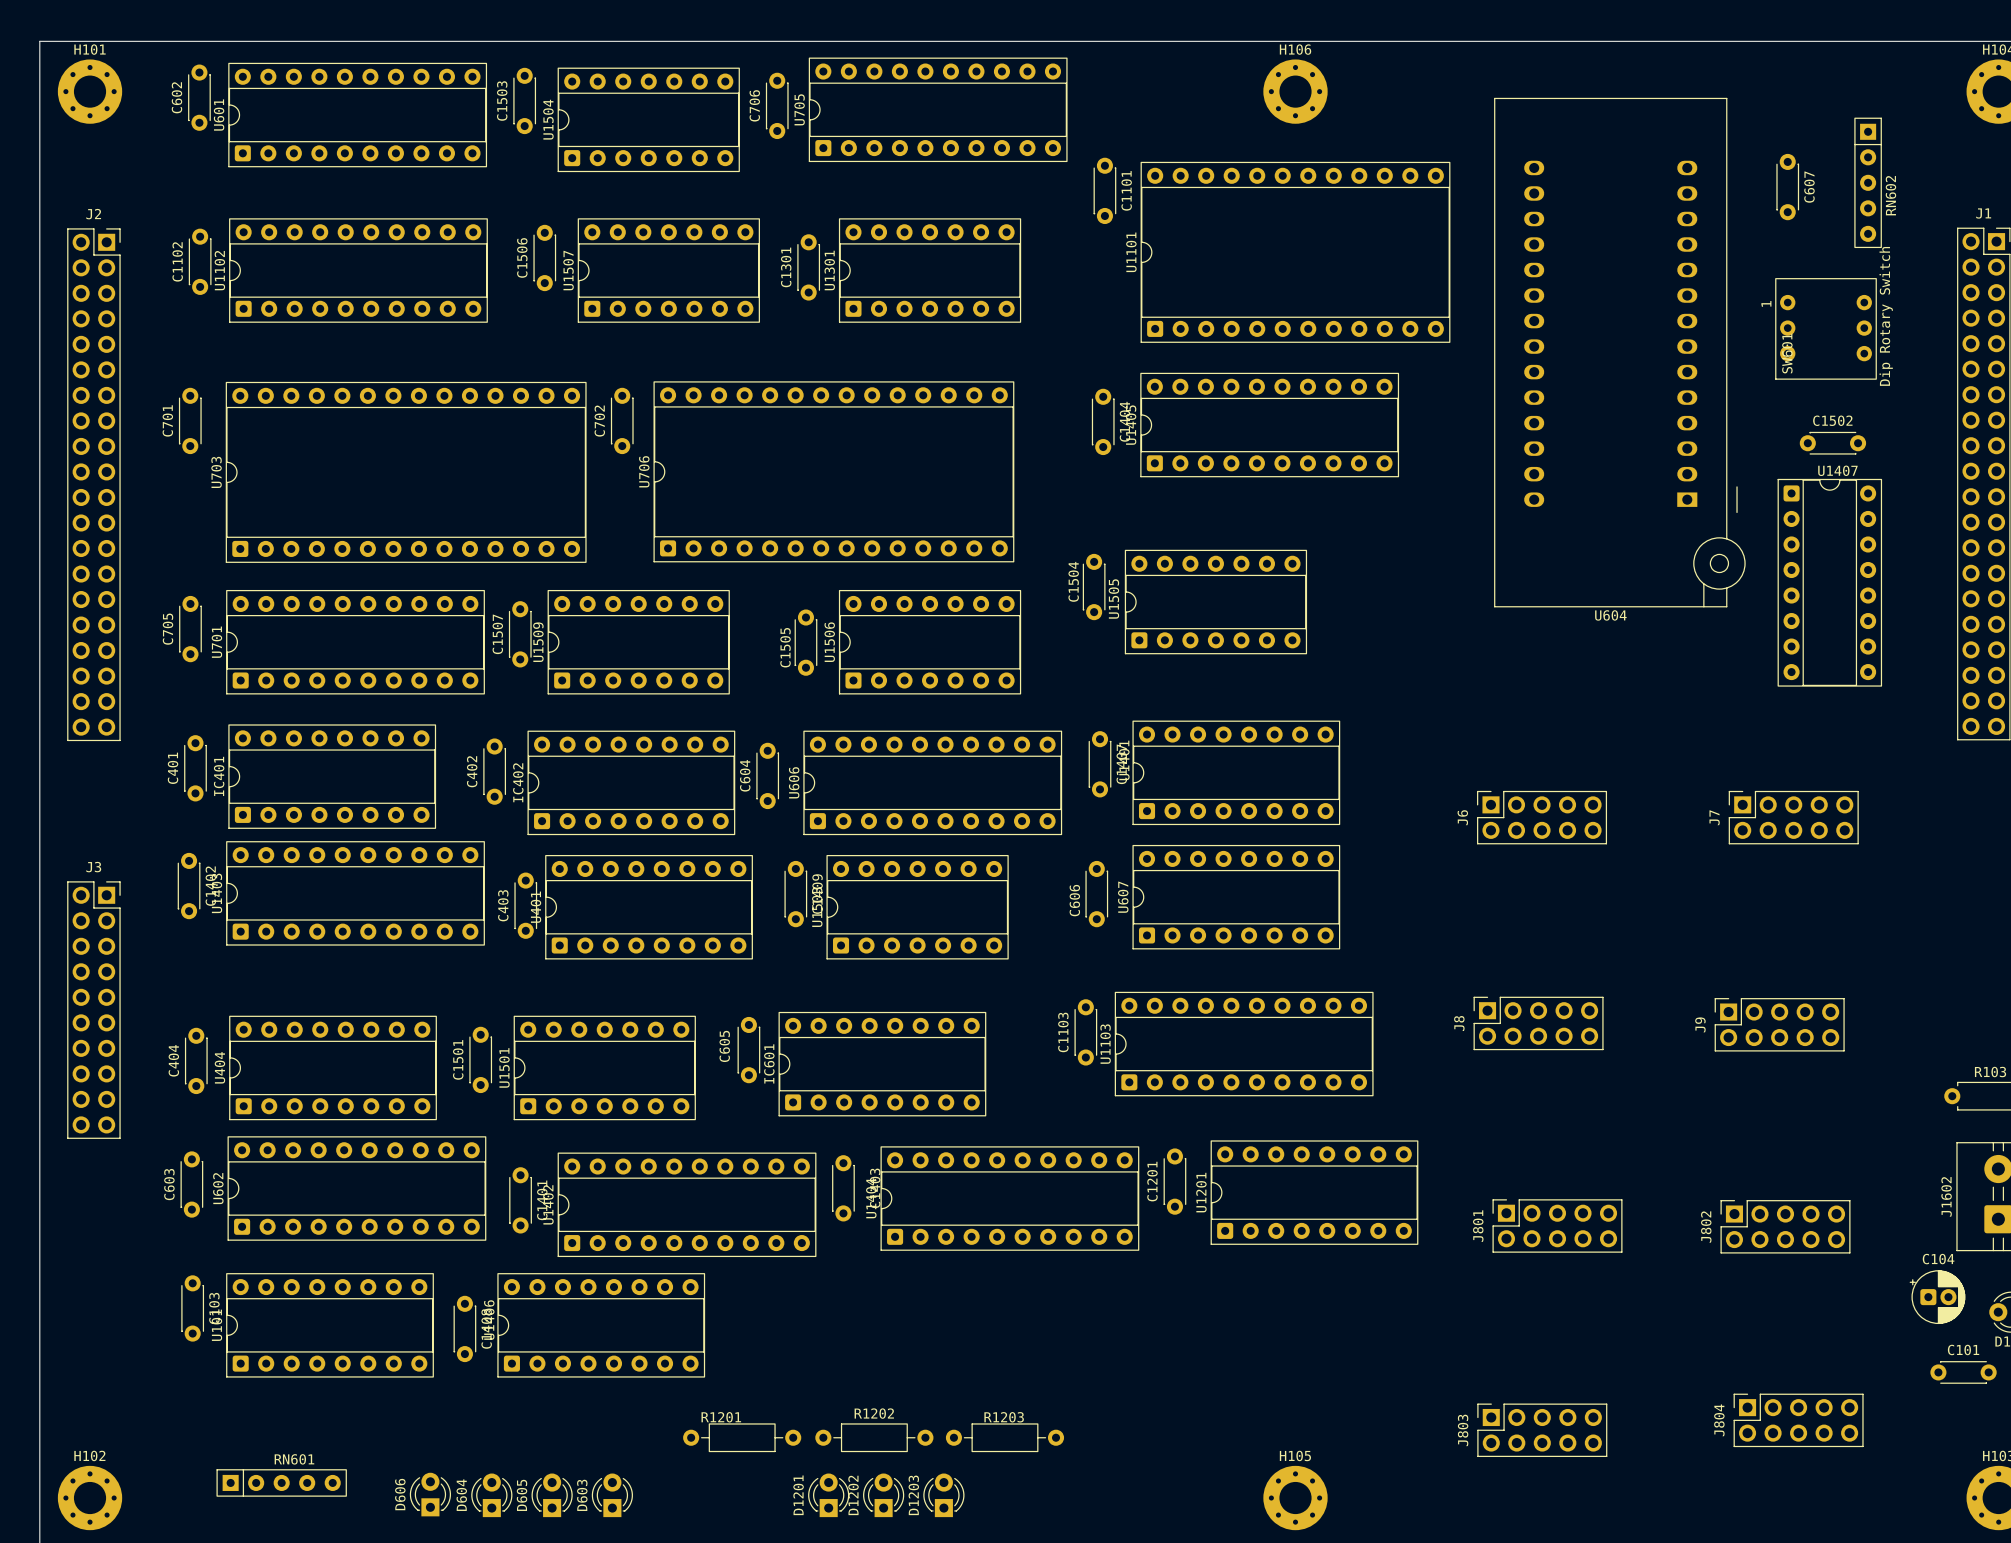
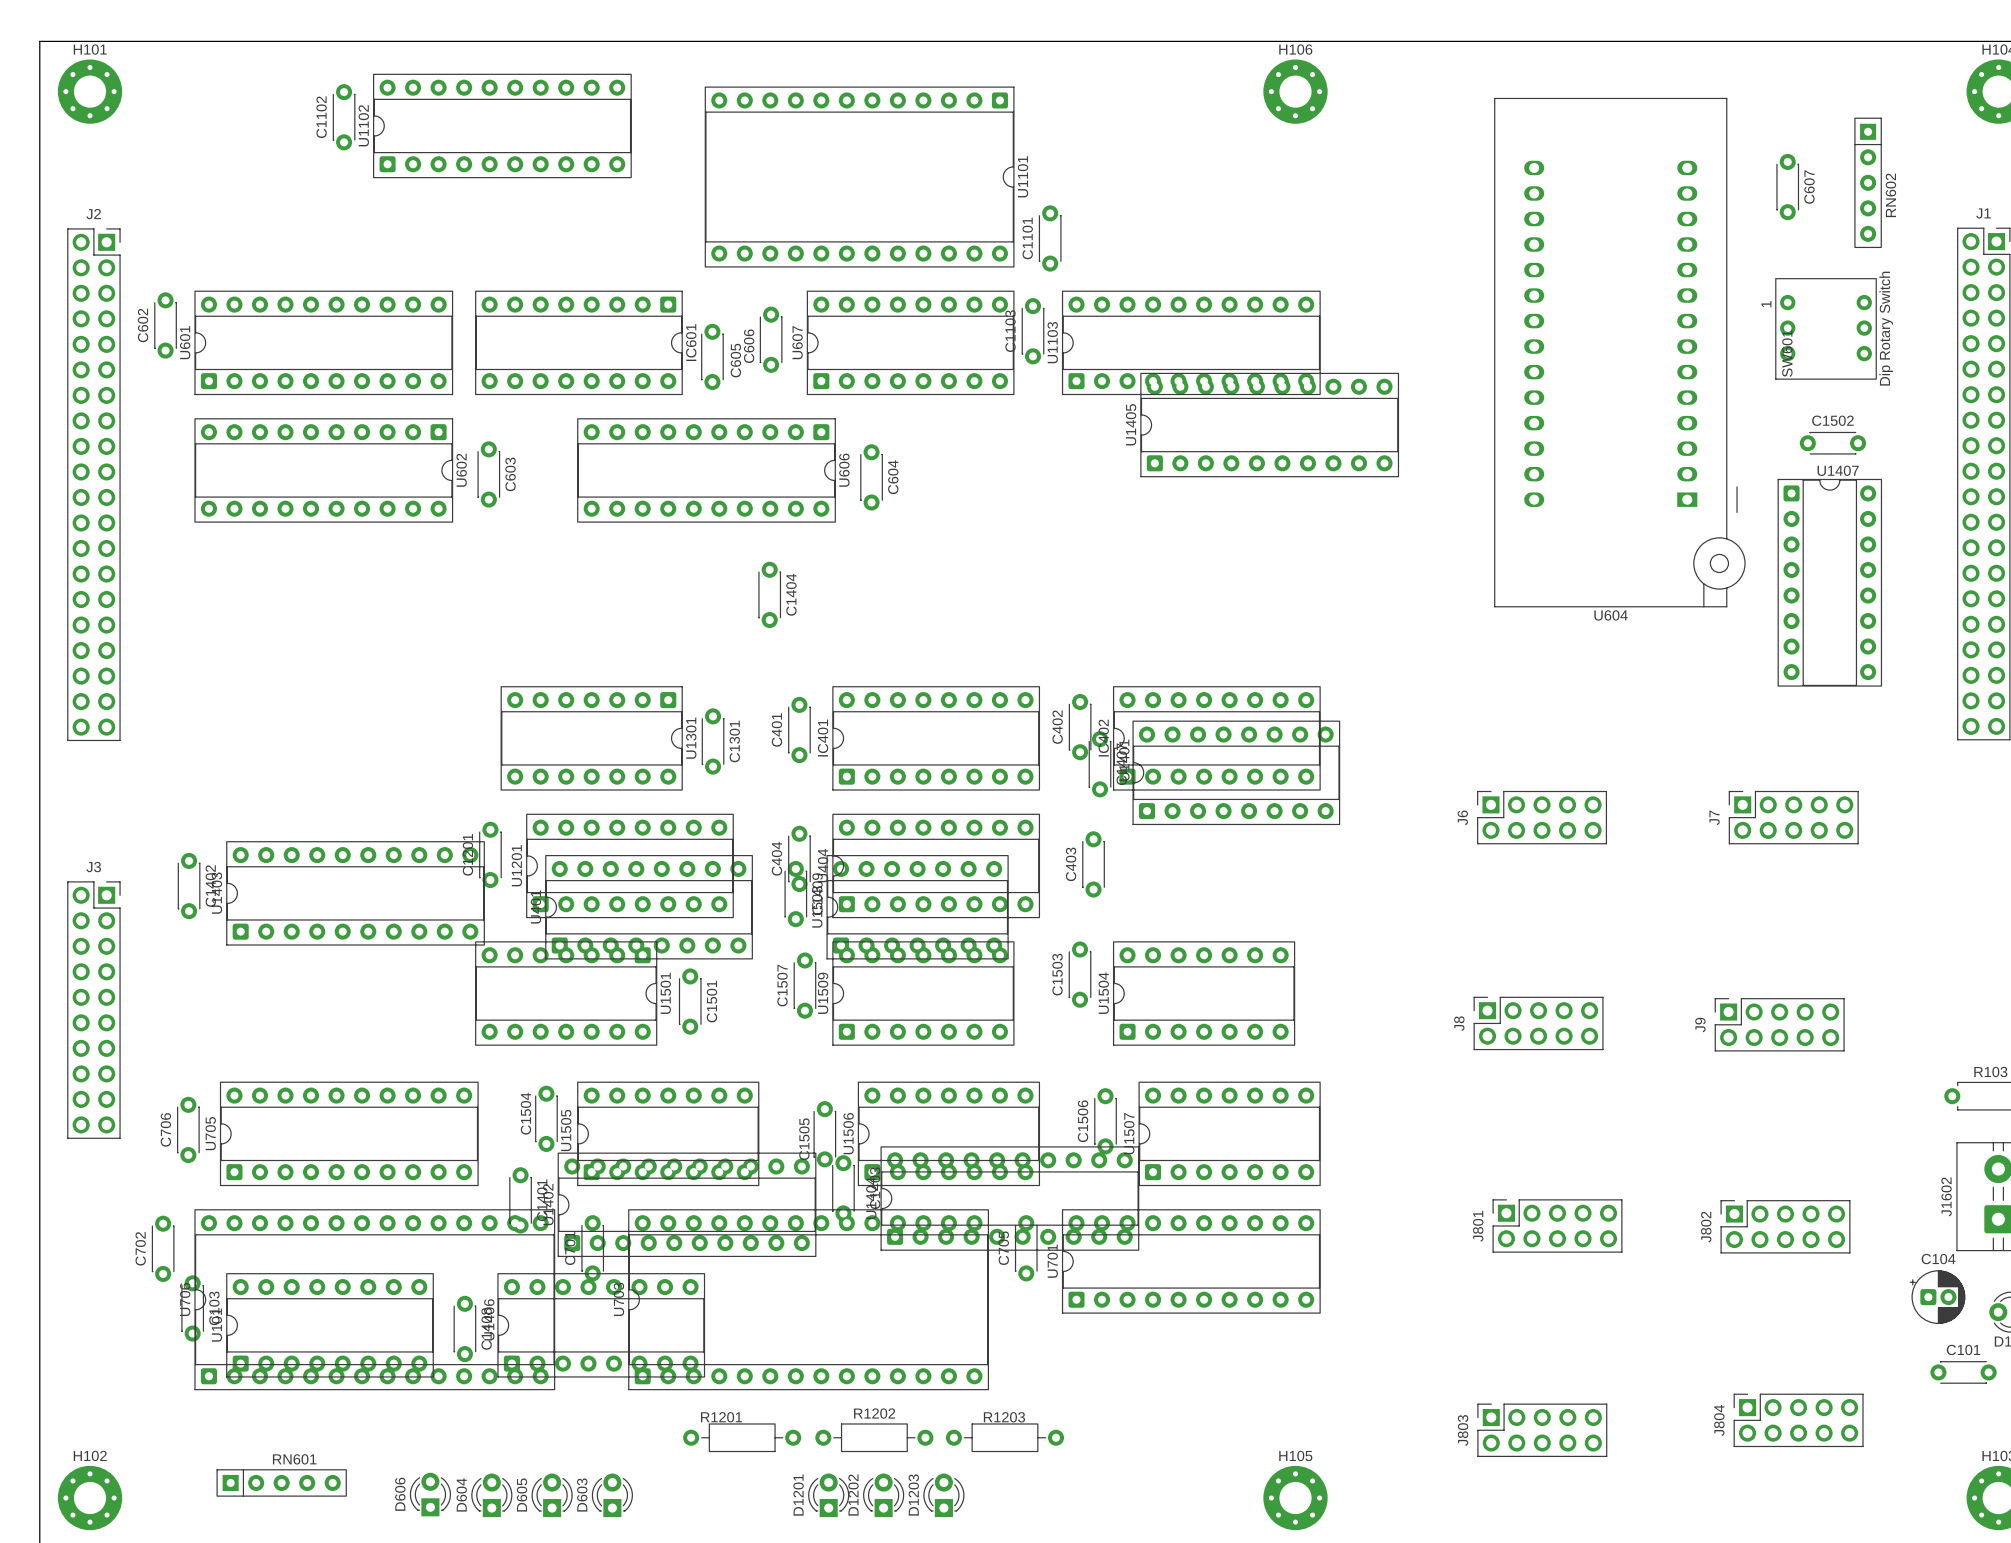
C602 position: (199, 97) -> (165, 325)
C1503 position: (524, 100) -> (1080, 974)
C706 position: (777, 105) -> (188, 1129)
U705 position: (938, 109) -> (349, 1133)
U601 position: (357, 115) -> (323, 342)
U1504 position: (648, 119) -> (1204, 993)
C1101 position: (1104, 190) -> (1050, 238)
C1101 name position: C1101 (1126, 190) -> C1101 (1027, 238)
U1101 rotation: 0° (1295, 252) -> 180° (859, 177)
U1101 position: (1295, 252) -> (859, 177)
C1506 position: (544, 257) -> (1105, 1121)
C1102 position: (200, 261) -> (344, 117)
C1301 name position: C1301 (786, 267) -> C1301 (734, 741)
C1301 position: (808, 267) -> (713, 741)
U1102 position: (358, 270) -> (502, 125)
U1507 position: (668, 270) -> (1229, 1133)
U1301 rotation: 0° (930, 270) -> 180° (591, 738)
U1301 position: (930, 270) -> (591, 738)
C701 position: (190, 420) -> (592, 1248)
C702 position: (622, 420) -> (163, 1248)
C1404 position: (1103, 421) -> (769, 594)
U706 position: (833, 471) -> (374, 1299)
U703 position: (406, 472) -> (808, 1299)
C1504 position: (1094, 587) -> (546, 1118)
U1505 position: (1215, 602) -> (668, 1133)
C705 position: (190, 629) -> (1026, 1248)
C1507 position: (520, 634) -> (804, 985)
U701 position: (355, 642) -> (1191, 1261)
U1509 position: (638, 642) -> (923, 993)
C1505 position: (805, 642) -> (824, 1134)
U1506 position: (930, 642) -> (948, 1133)
C401 position: (195, 768) -> (799, 730)
C402 position: (494, 771) -> (1080, 727)
C604 name position: C604 (745, 775) -> C604 (893, 477)
C604 position: (767, 775) -> (871, 477)
IC401 position: (332, 776) -> (936, 738)
IC402 position: (631, 782) -> (1216, 738)
U606 rotation: 0° (932, 782) -> 180° (706, 470)
U606 position: (932, 782) -> (706, 470)
C606 position: (1096, 894) -> (771, 339)
U607 position: (1236, 897) -> (910, 342)
C403 position: (525, 905) -> (1093, 864)
C1103 position: (1085, 1032) -> (1033, 331)
U1103 position: (1244, 1044) -> (1191, 342)
C605 name position: C605 (724, 1046) -> C605 (735, 360)
C605 position: (748, 1050) -> (712, 356)
C1501 name position: C1501 (458, 1059) -> C1501 (711, 1001)
C1501 position: (480, 1059) -> (690, 1001)
C404 position: (196, 1060) -> (799, 858)
IC601 rotation: 0° (882, 1064) -> 180° (578, 342)
IC601 position: (882, 1064) -> (578, 342)
U404 position: (333, 1067) -> (936, 865)
U1501 rotation: 0° (604, 1067) -> 180° (566, 993)
C1201 position: (1174, 1181) -> (490, 854)
C603 name position: C603 (169, 1184) -> C603 (510, 474)
C603 position: (191, 1184) -> (488, 474)
U602 rotation: 0° (356, 1188) -> 180° (323, 470)
U602 position: (356, 1188) -> (323, 470)
U1201 position: (1314, 1192) -> (629, 865)

